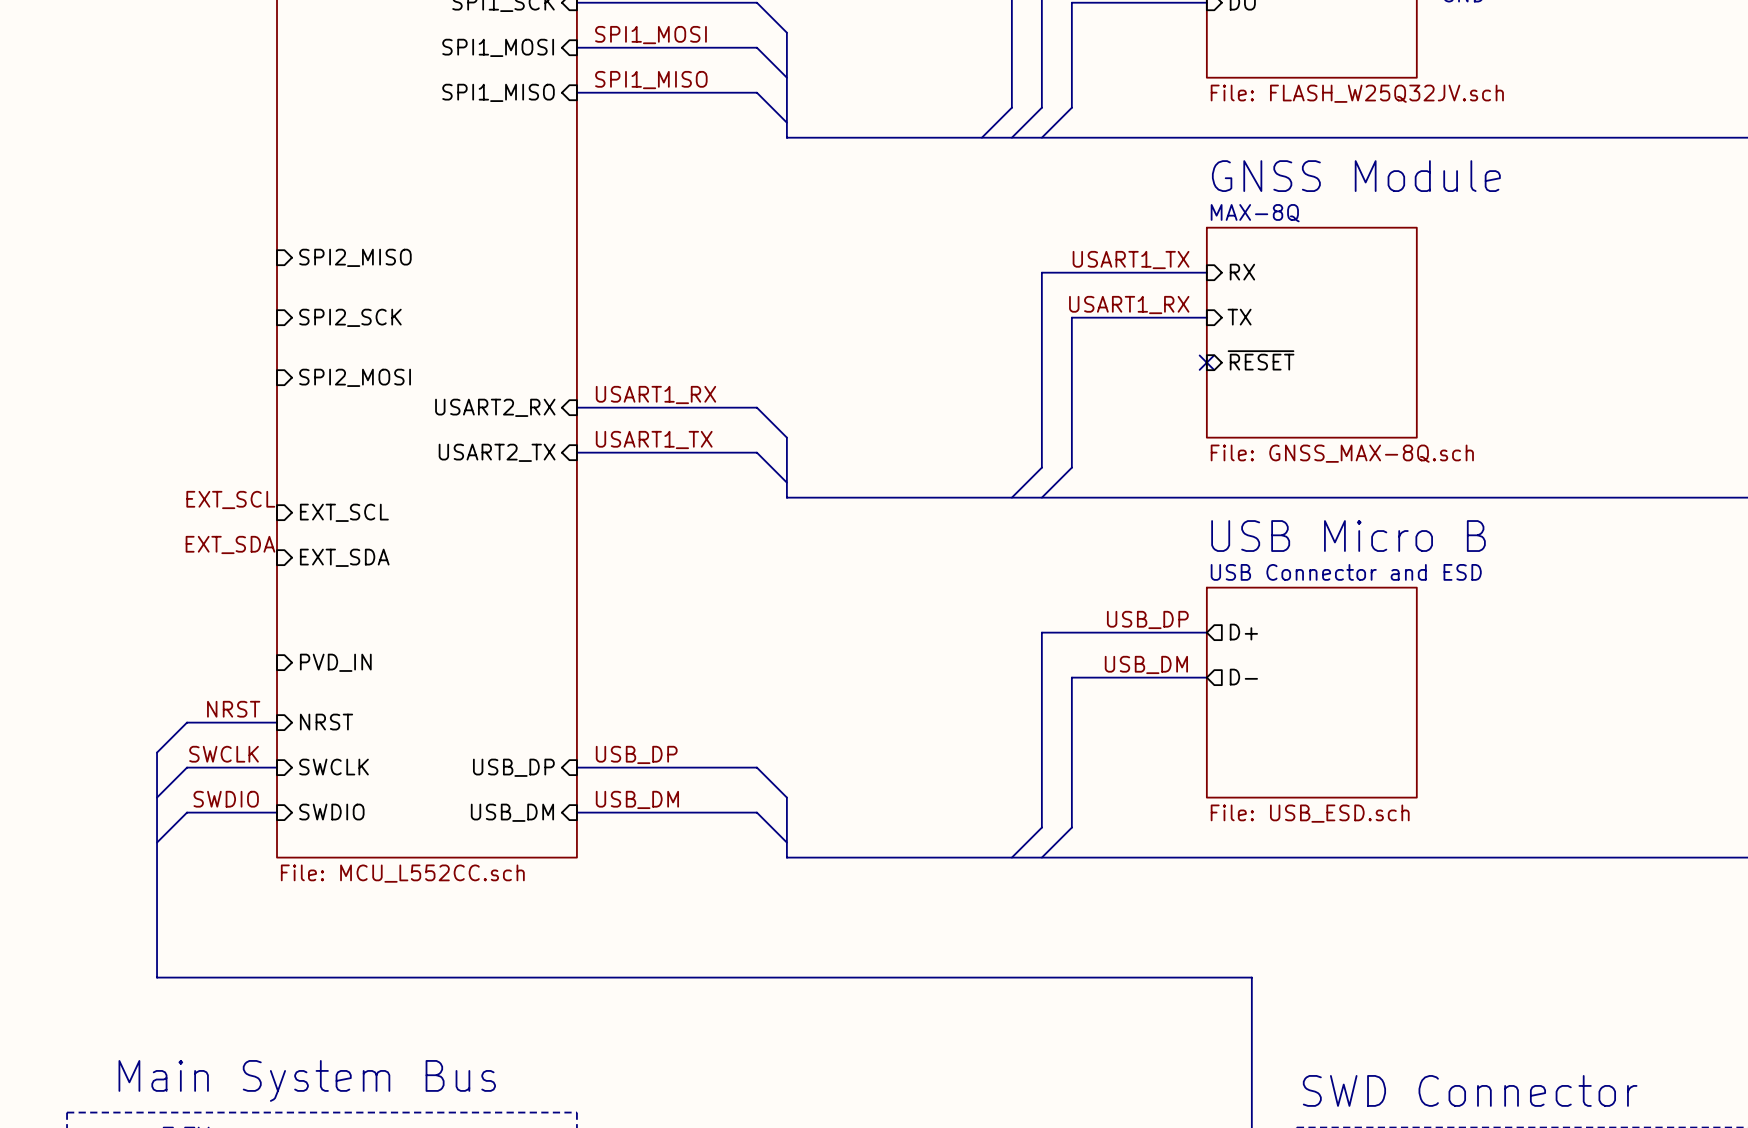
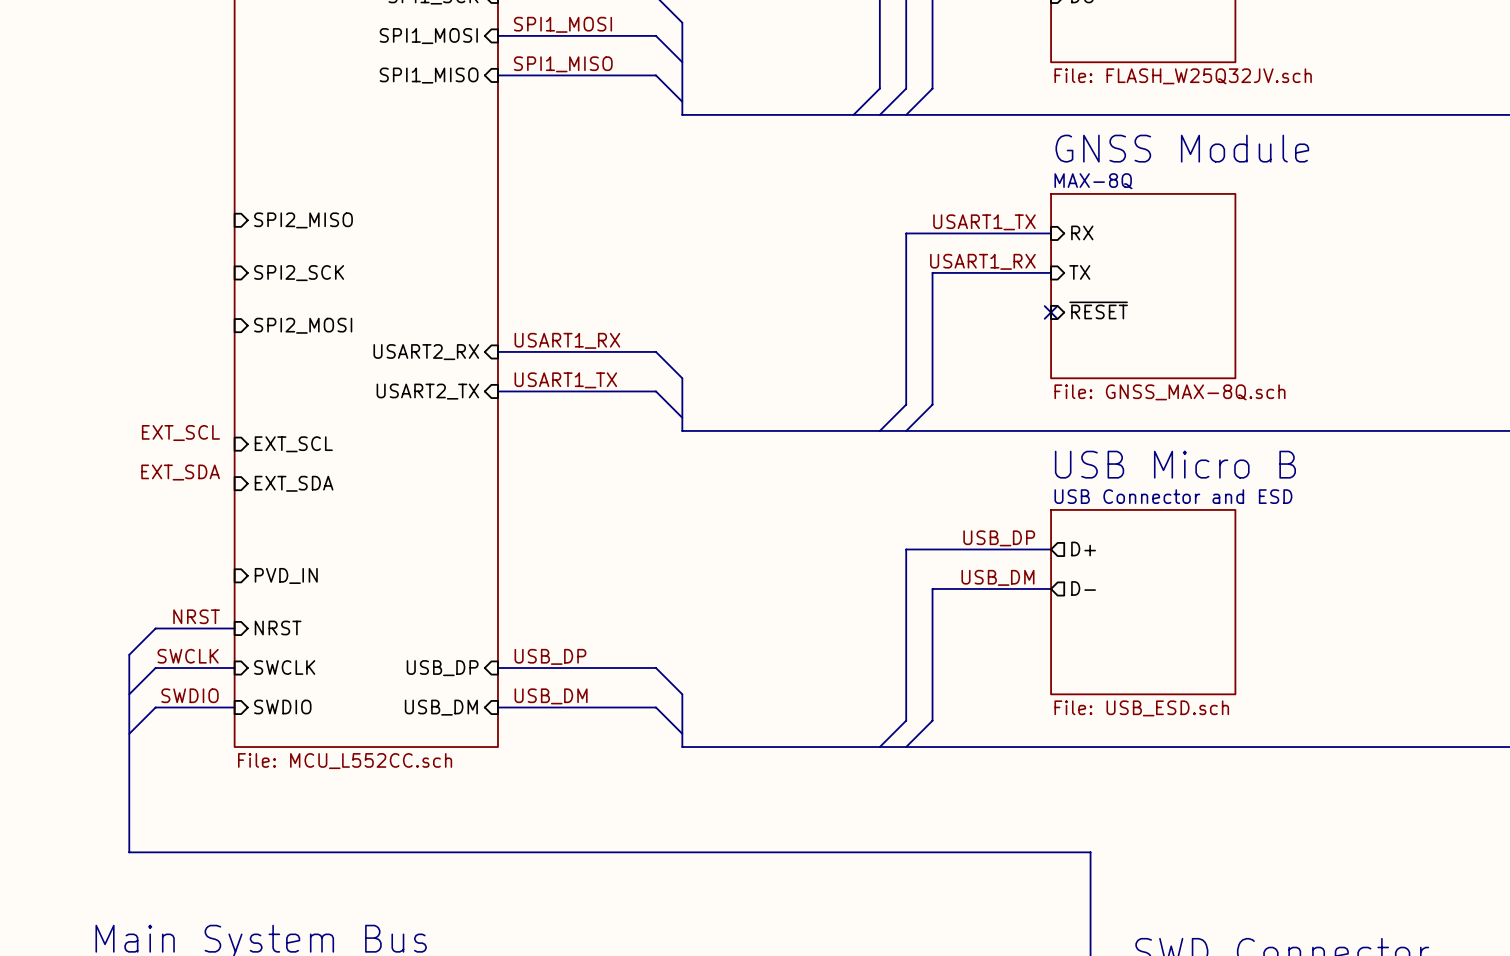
label position: EXT_SCL (230, 499) -> EXT_SCL (180, 433)
label position: EXT_SDA (230, 544) -> EXT_SDA (180, 472)

